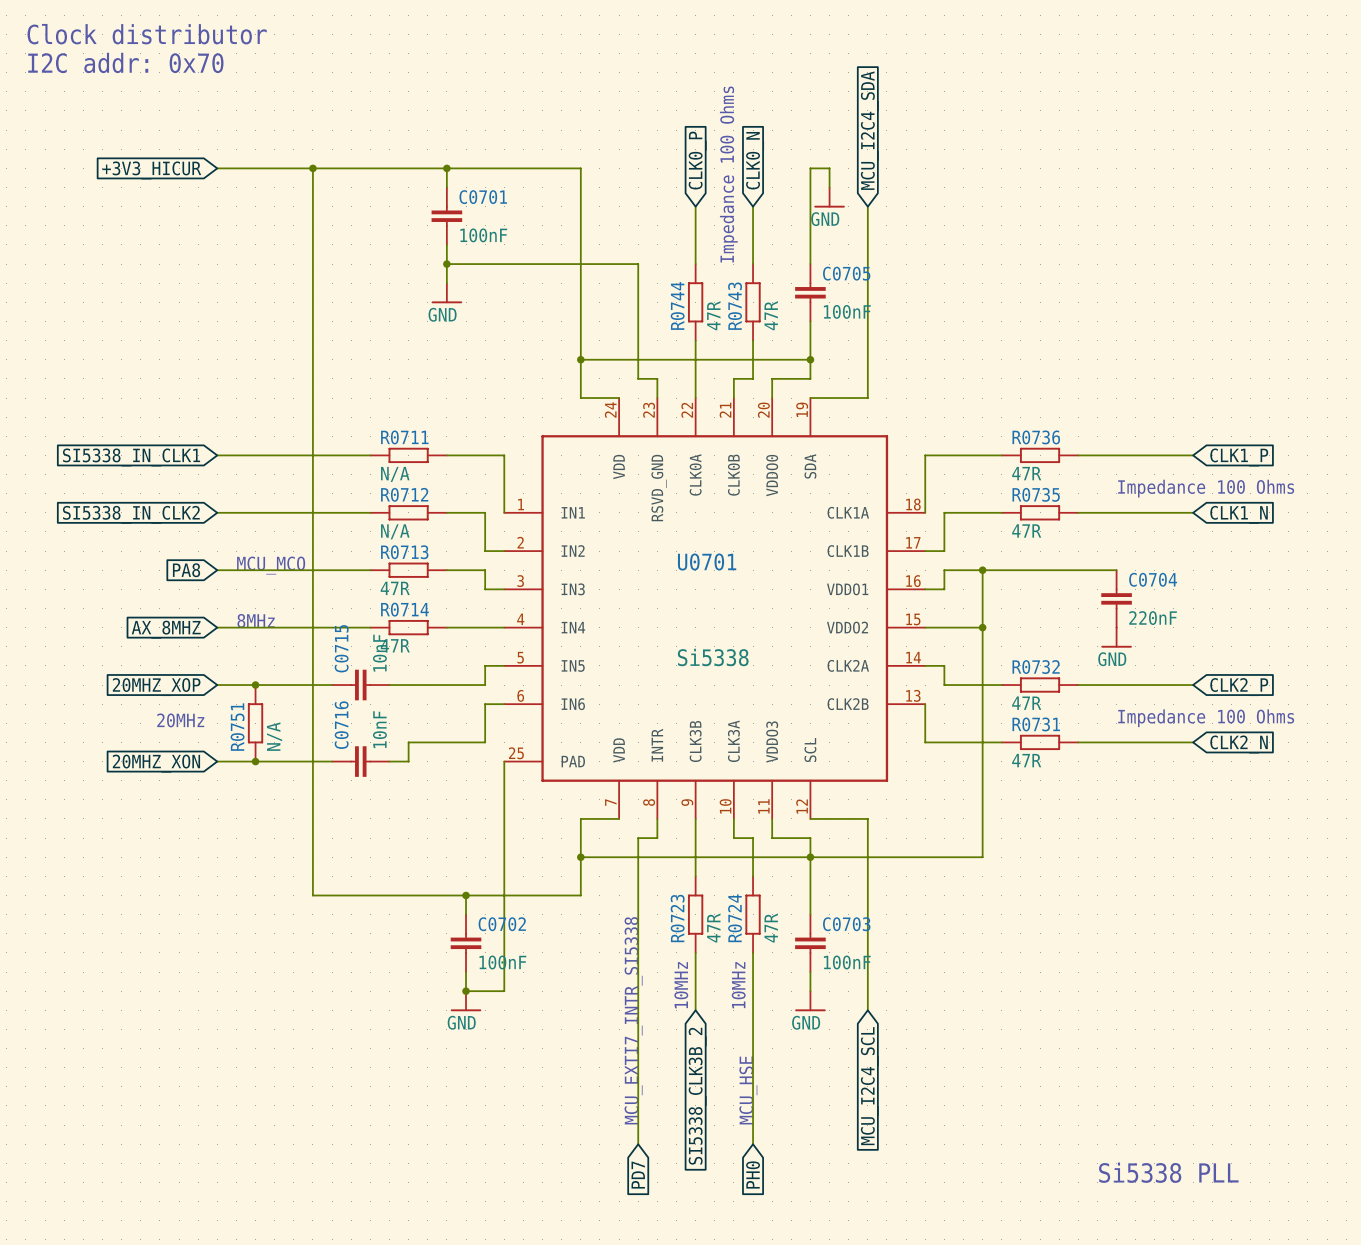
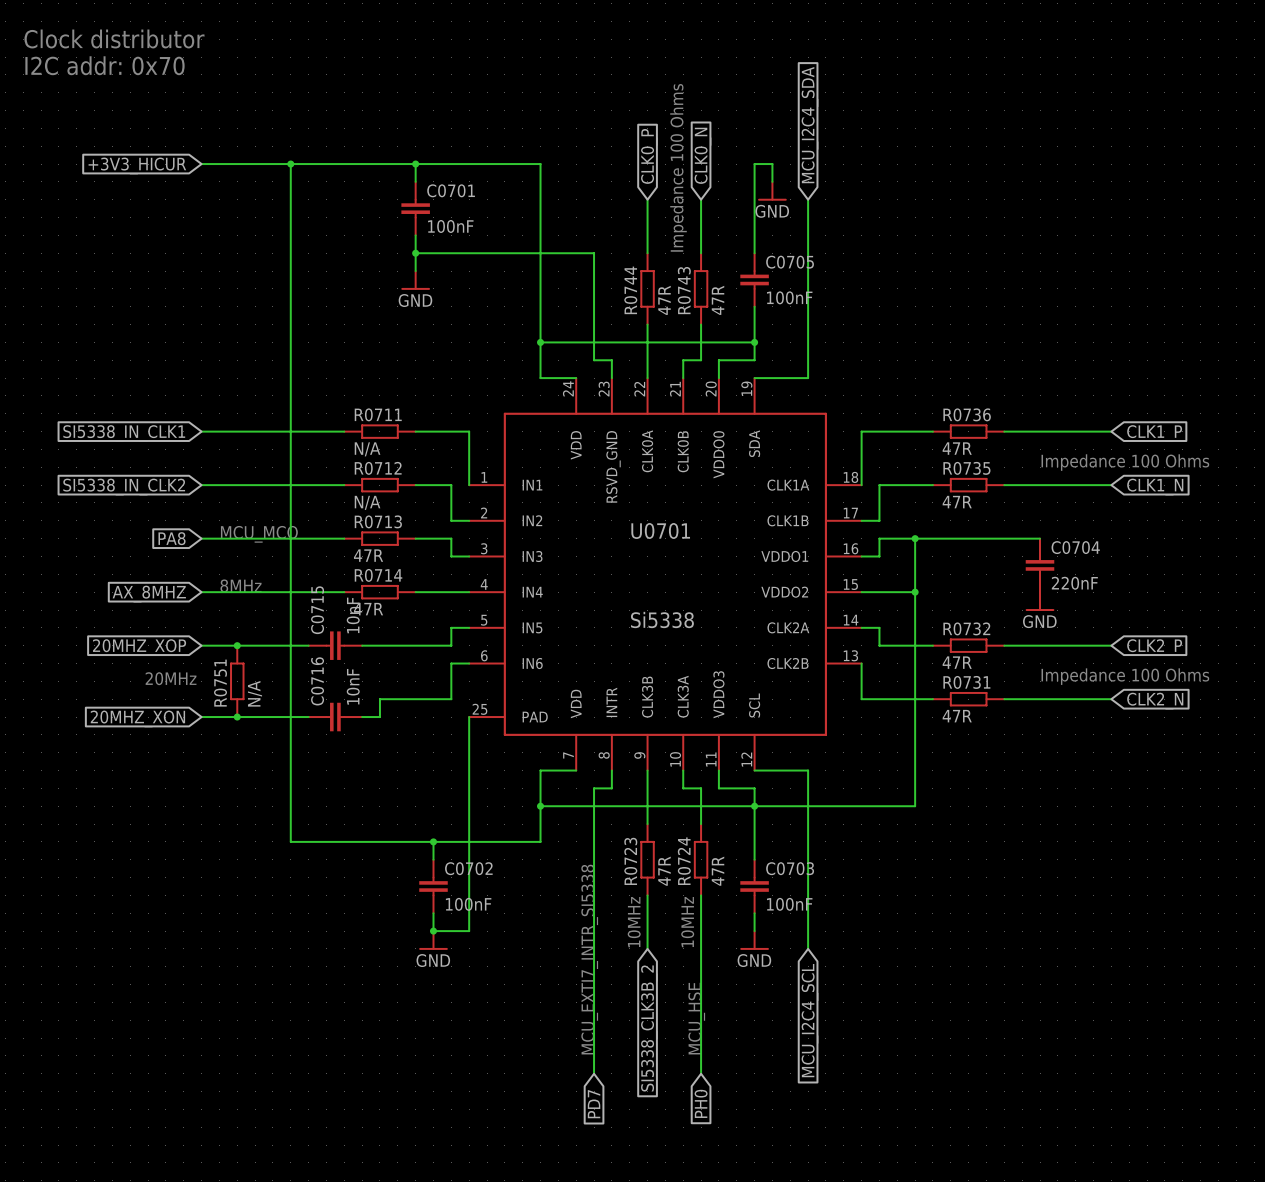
text: Si5338 PLL (1168, 1172) -> none

